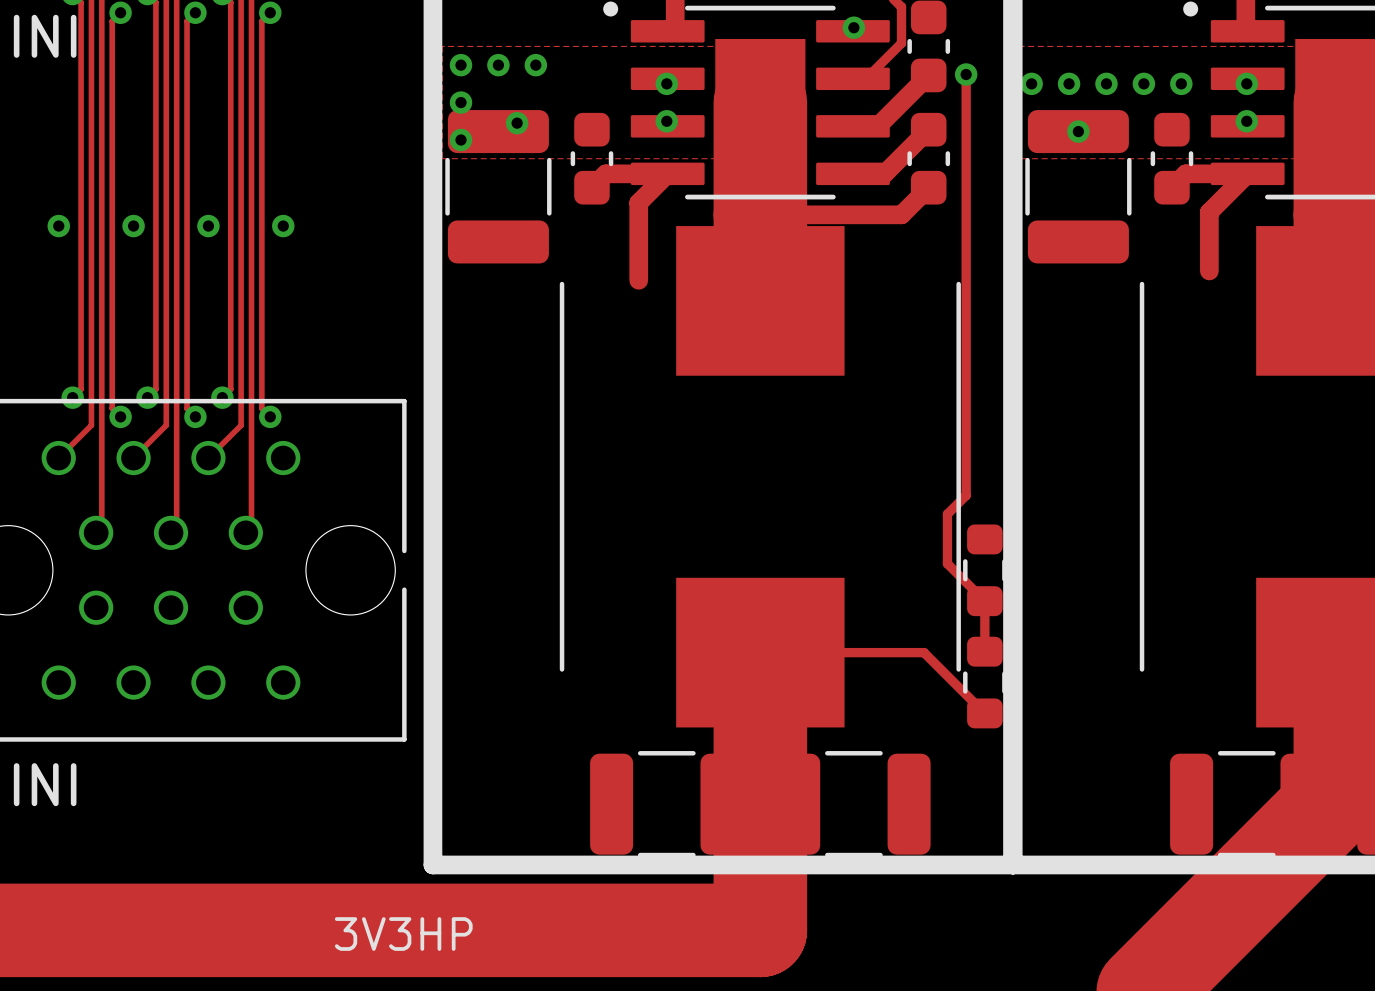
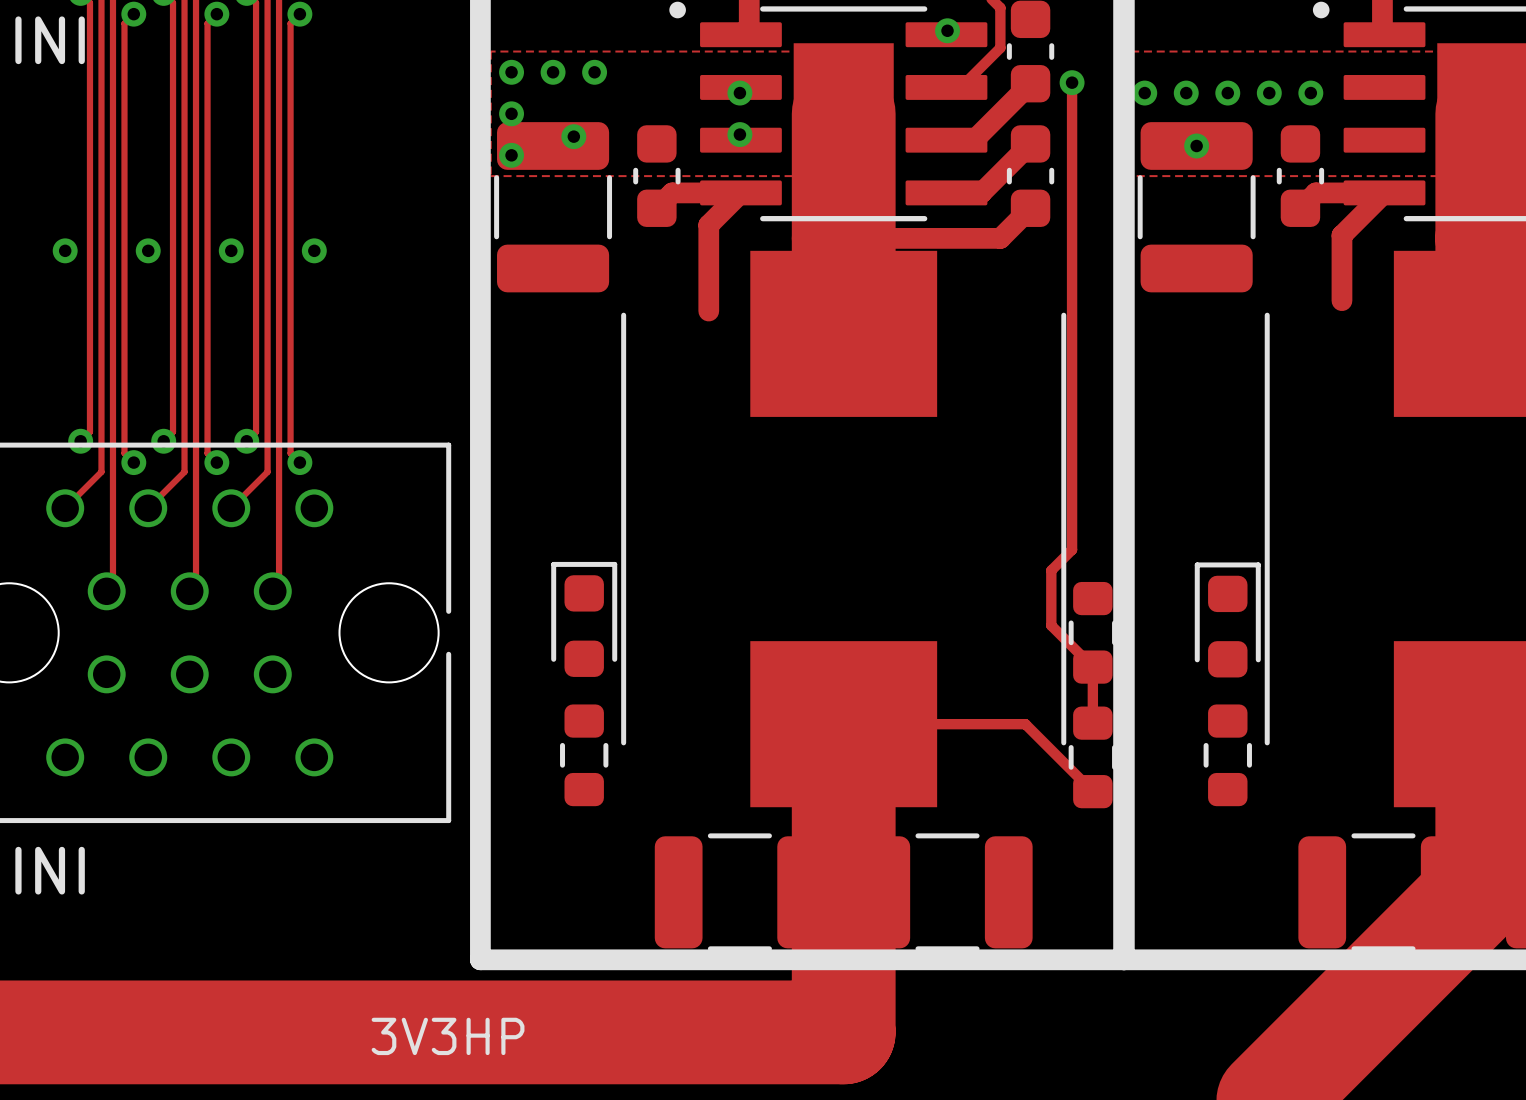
via: (1246, 83) -> none
via: (1246, 121) -> none
part: none -> (584, 619)
part: none -> (1227, 619)
part: none -> (584, 755)
part: none -> (1227, 755)

